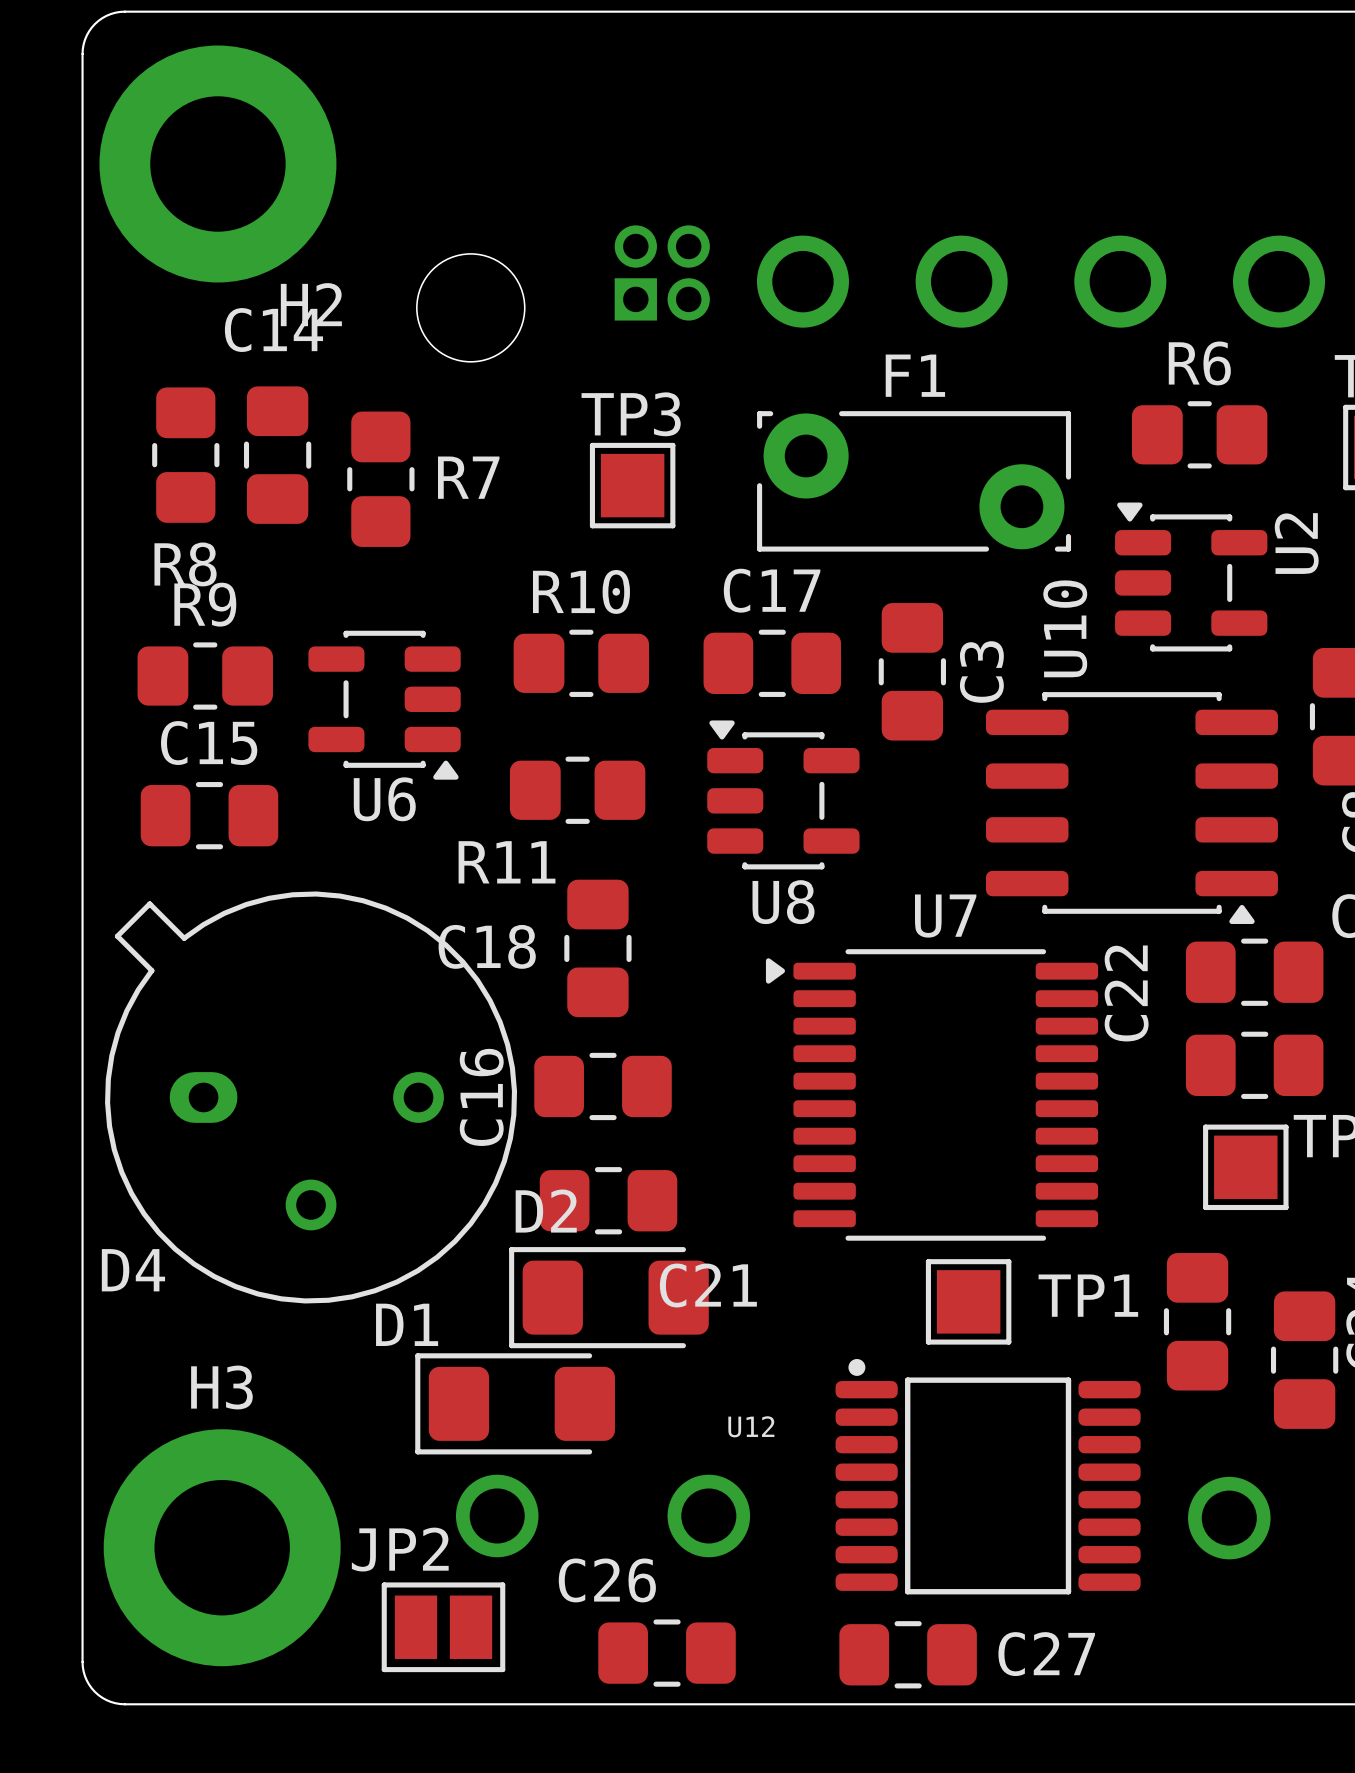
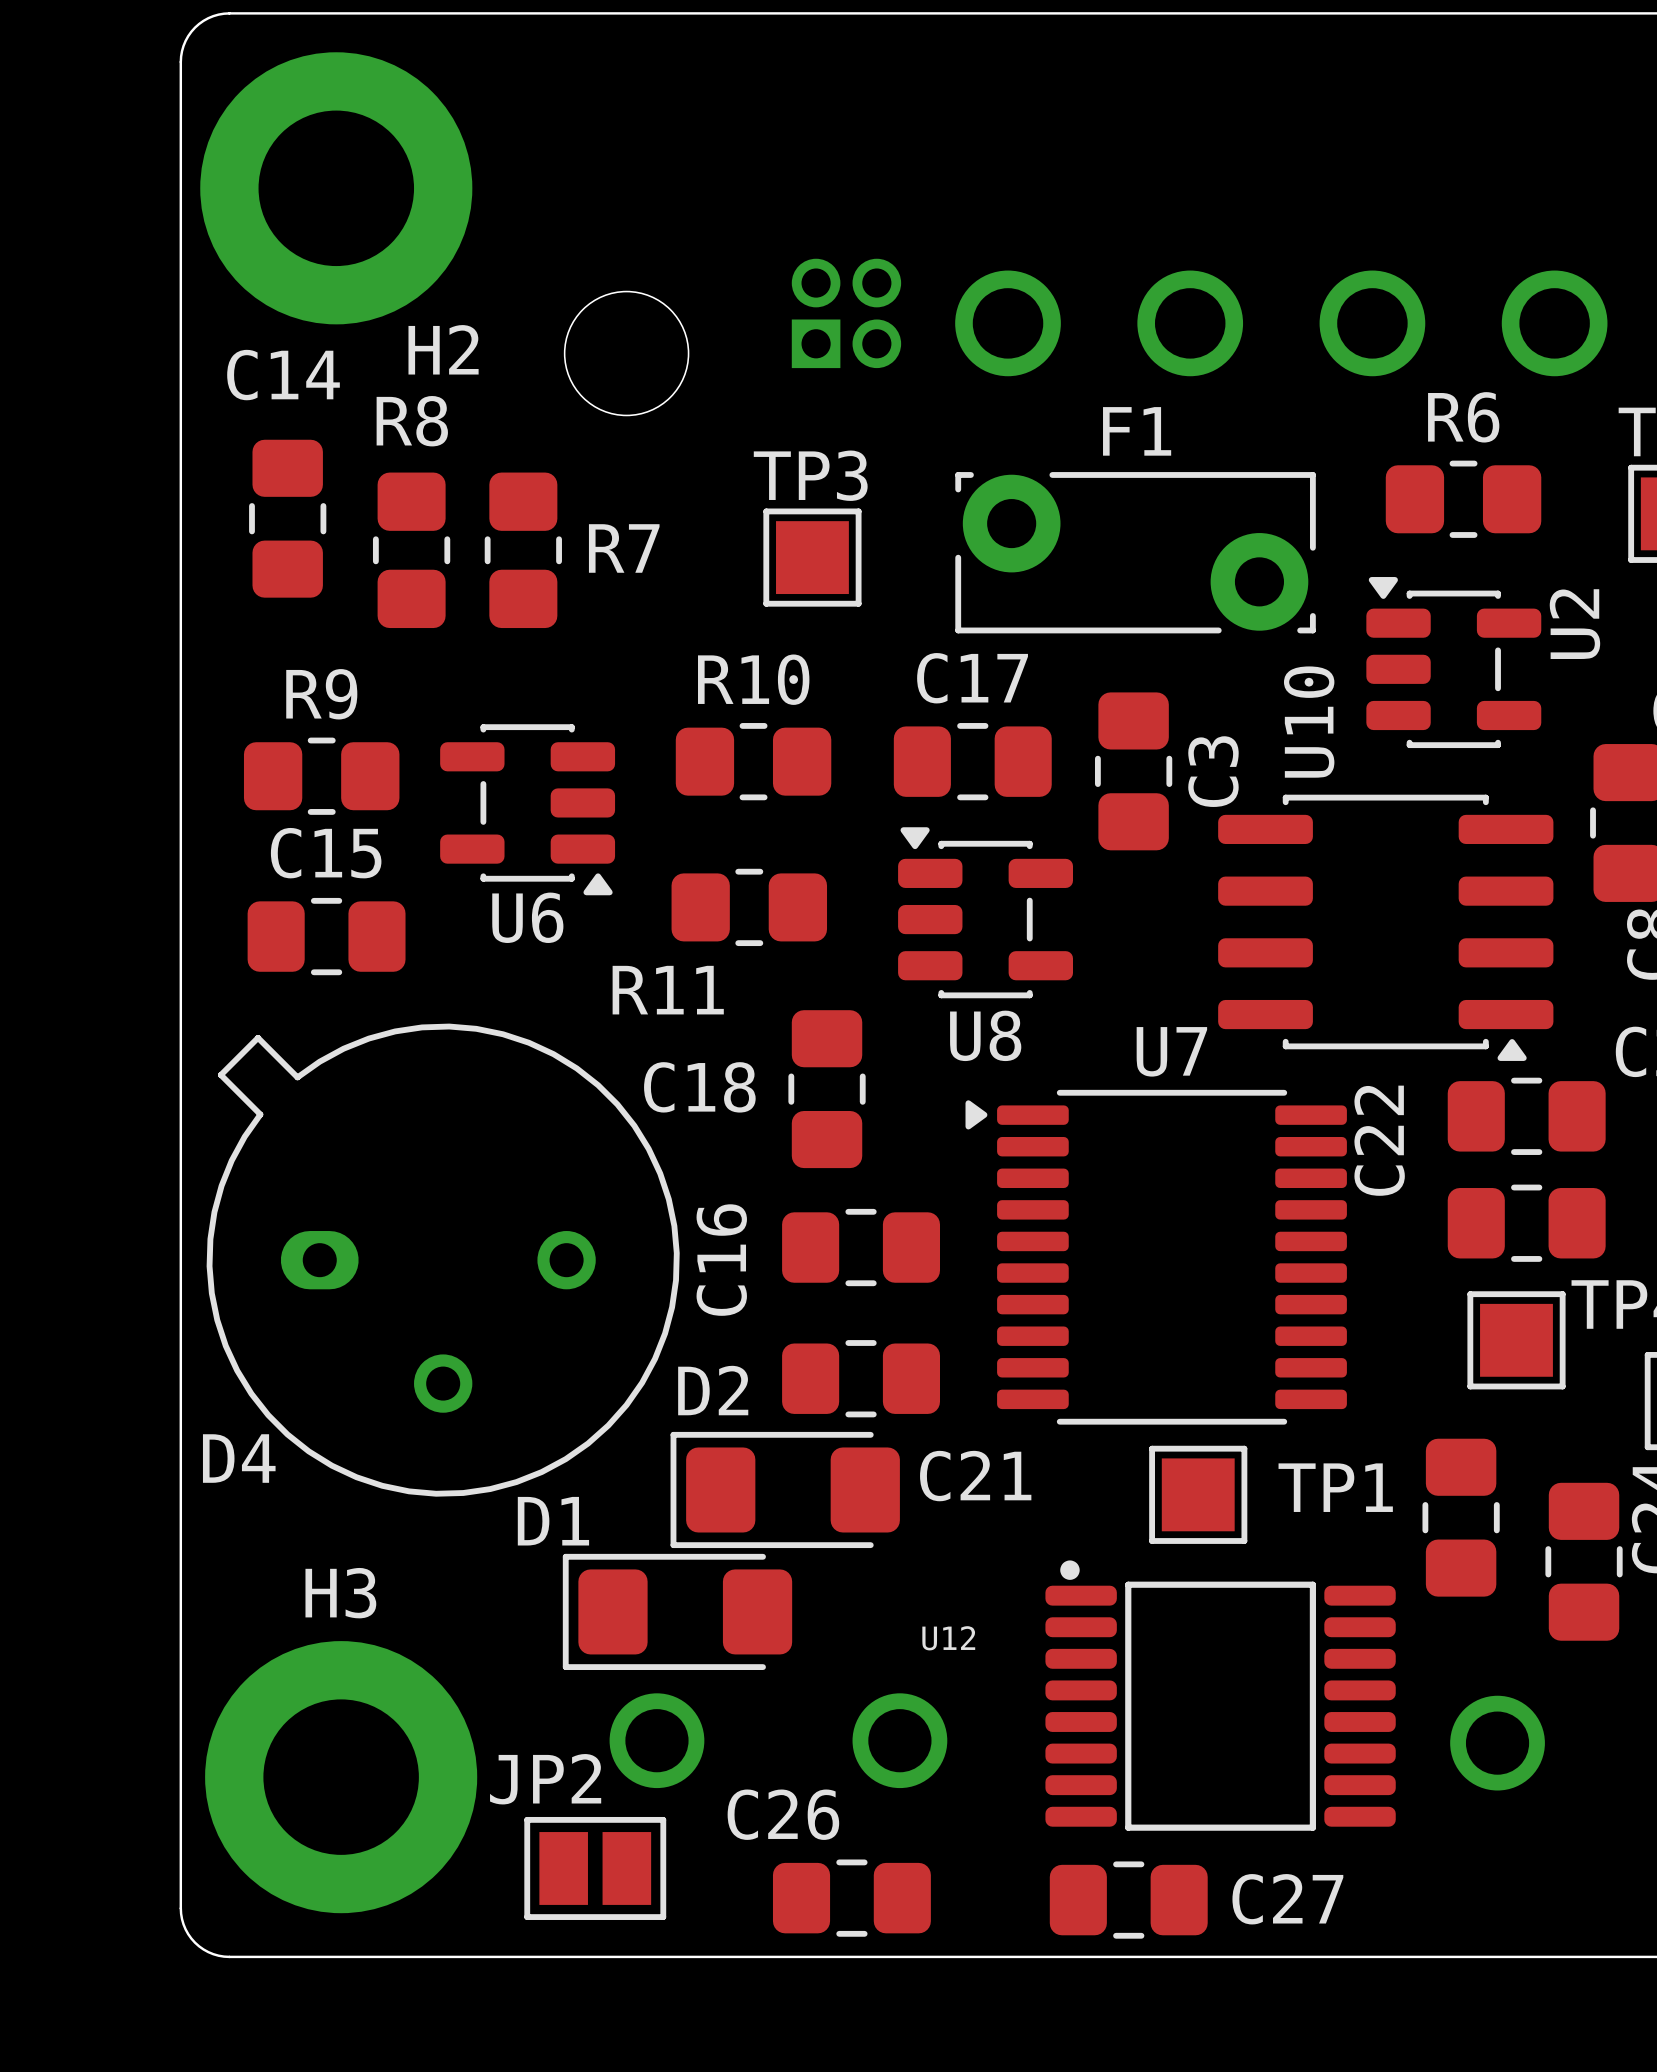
R8 position: (185, 455) -> (411, 550)
C14 position: (277, 455) -> (287, 518)
R8 name position: R8 (185, 564) -> R8 (412, 421)
C18 position: (597, 948) -> (827, 1089)
C16 position: (603, 1086) -> (861, 1247)
C21 position: (608, 1200) -> (861, 1378)

